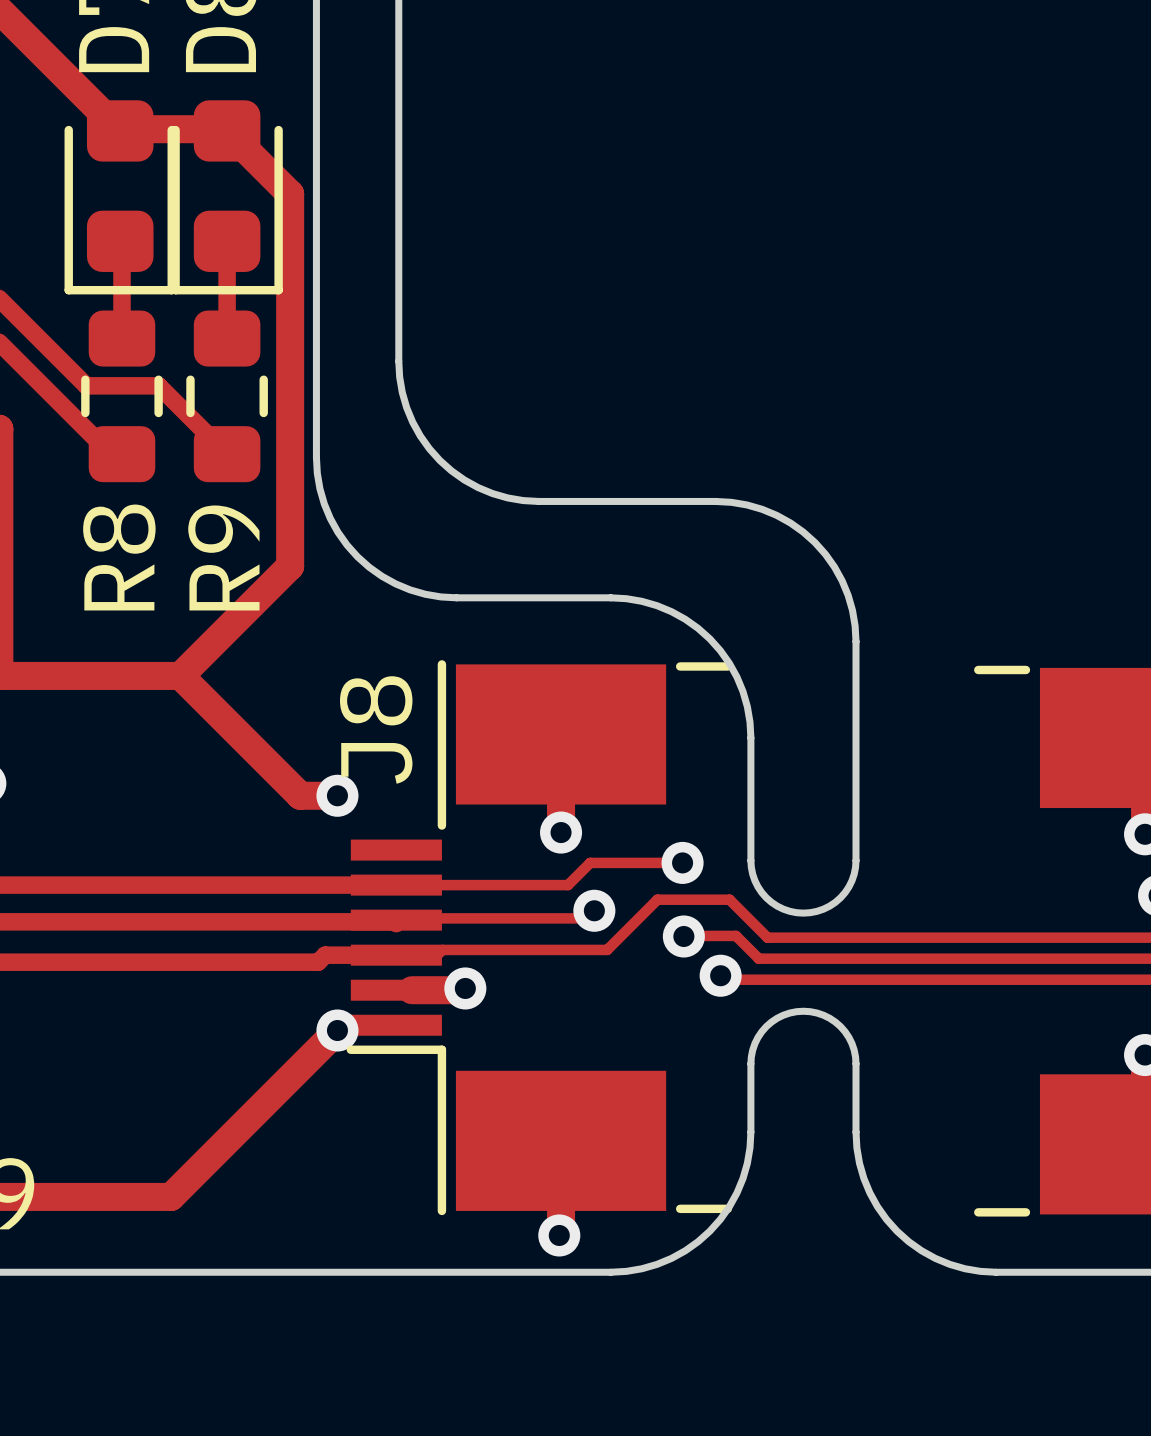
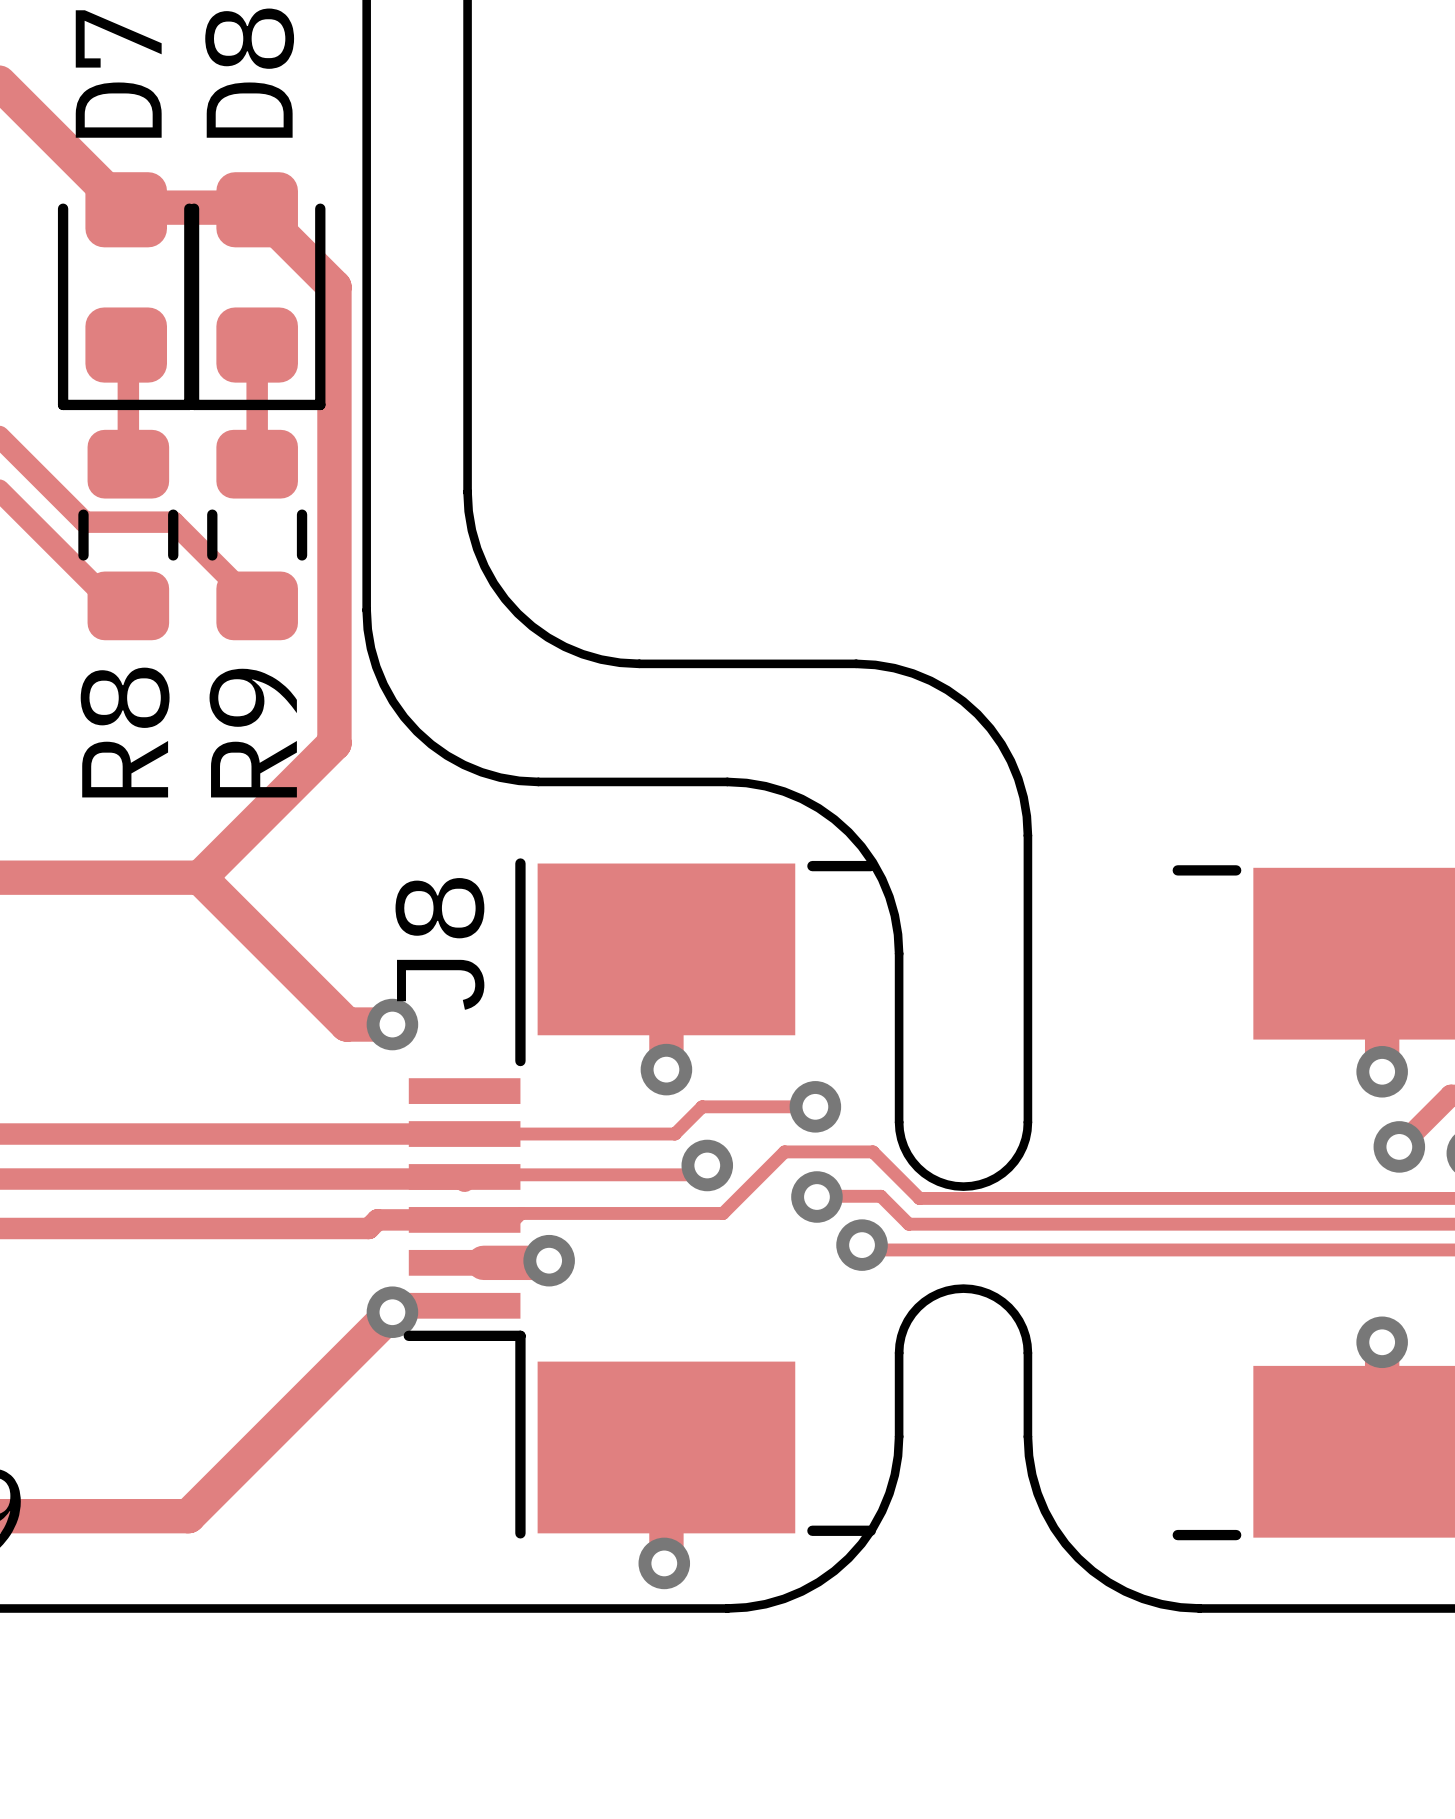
board edge: (750, 860) (754, 880) (766, 897) (783, 909) (803, 913) (823, 909) (840, 897) (852, 880) (856, 860) -> (899, 1103) (901, 1138) (912, 1161) (931, 1178) (946, 1184) (963, 1186) (980, 1184) (995, 1178) (1014, 1161) (1025, 1138) (1027, 1103)

